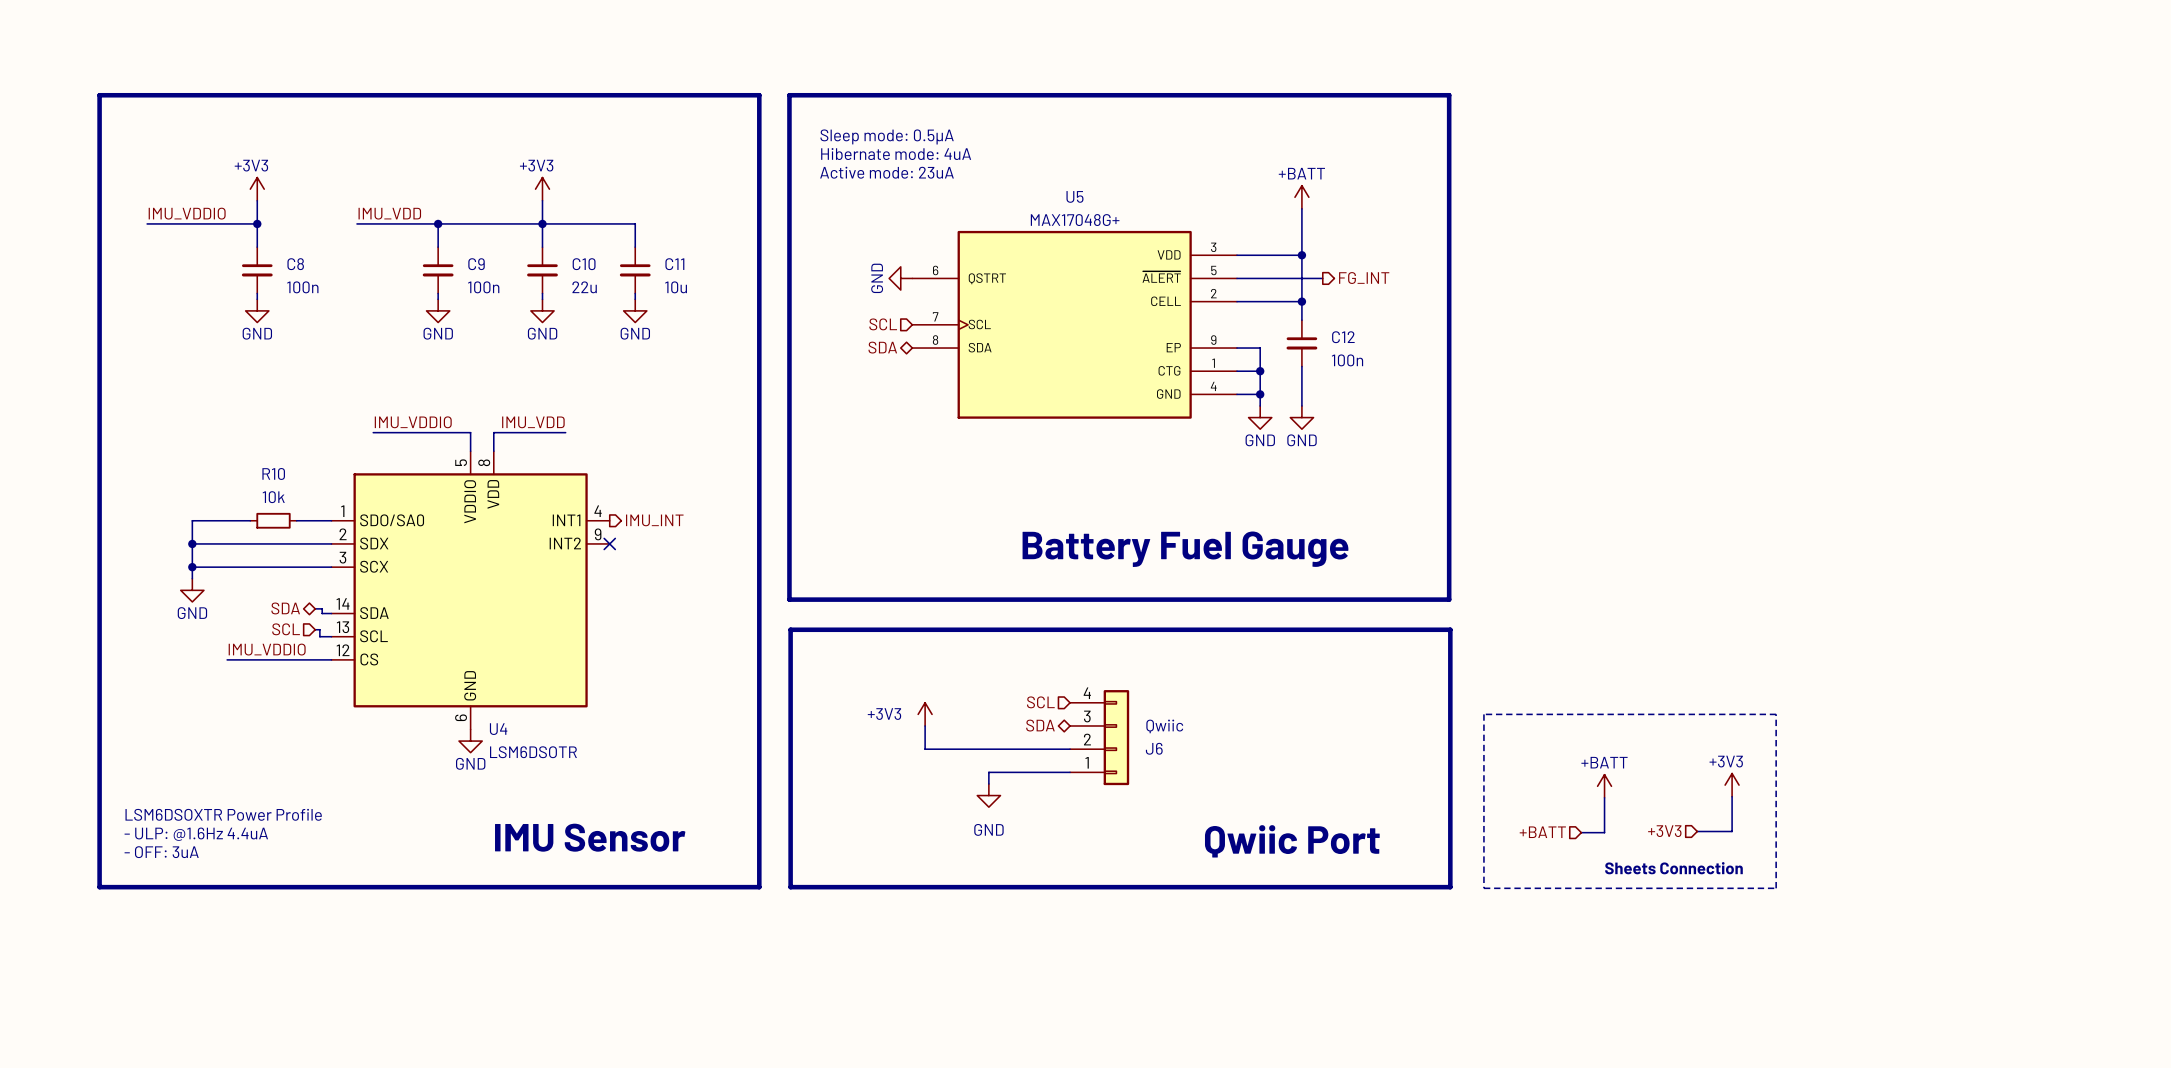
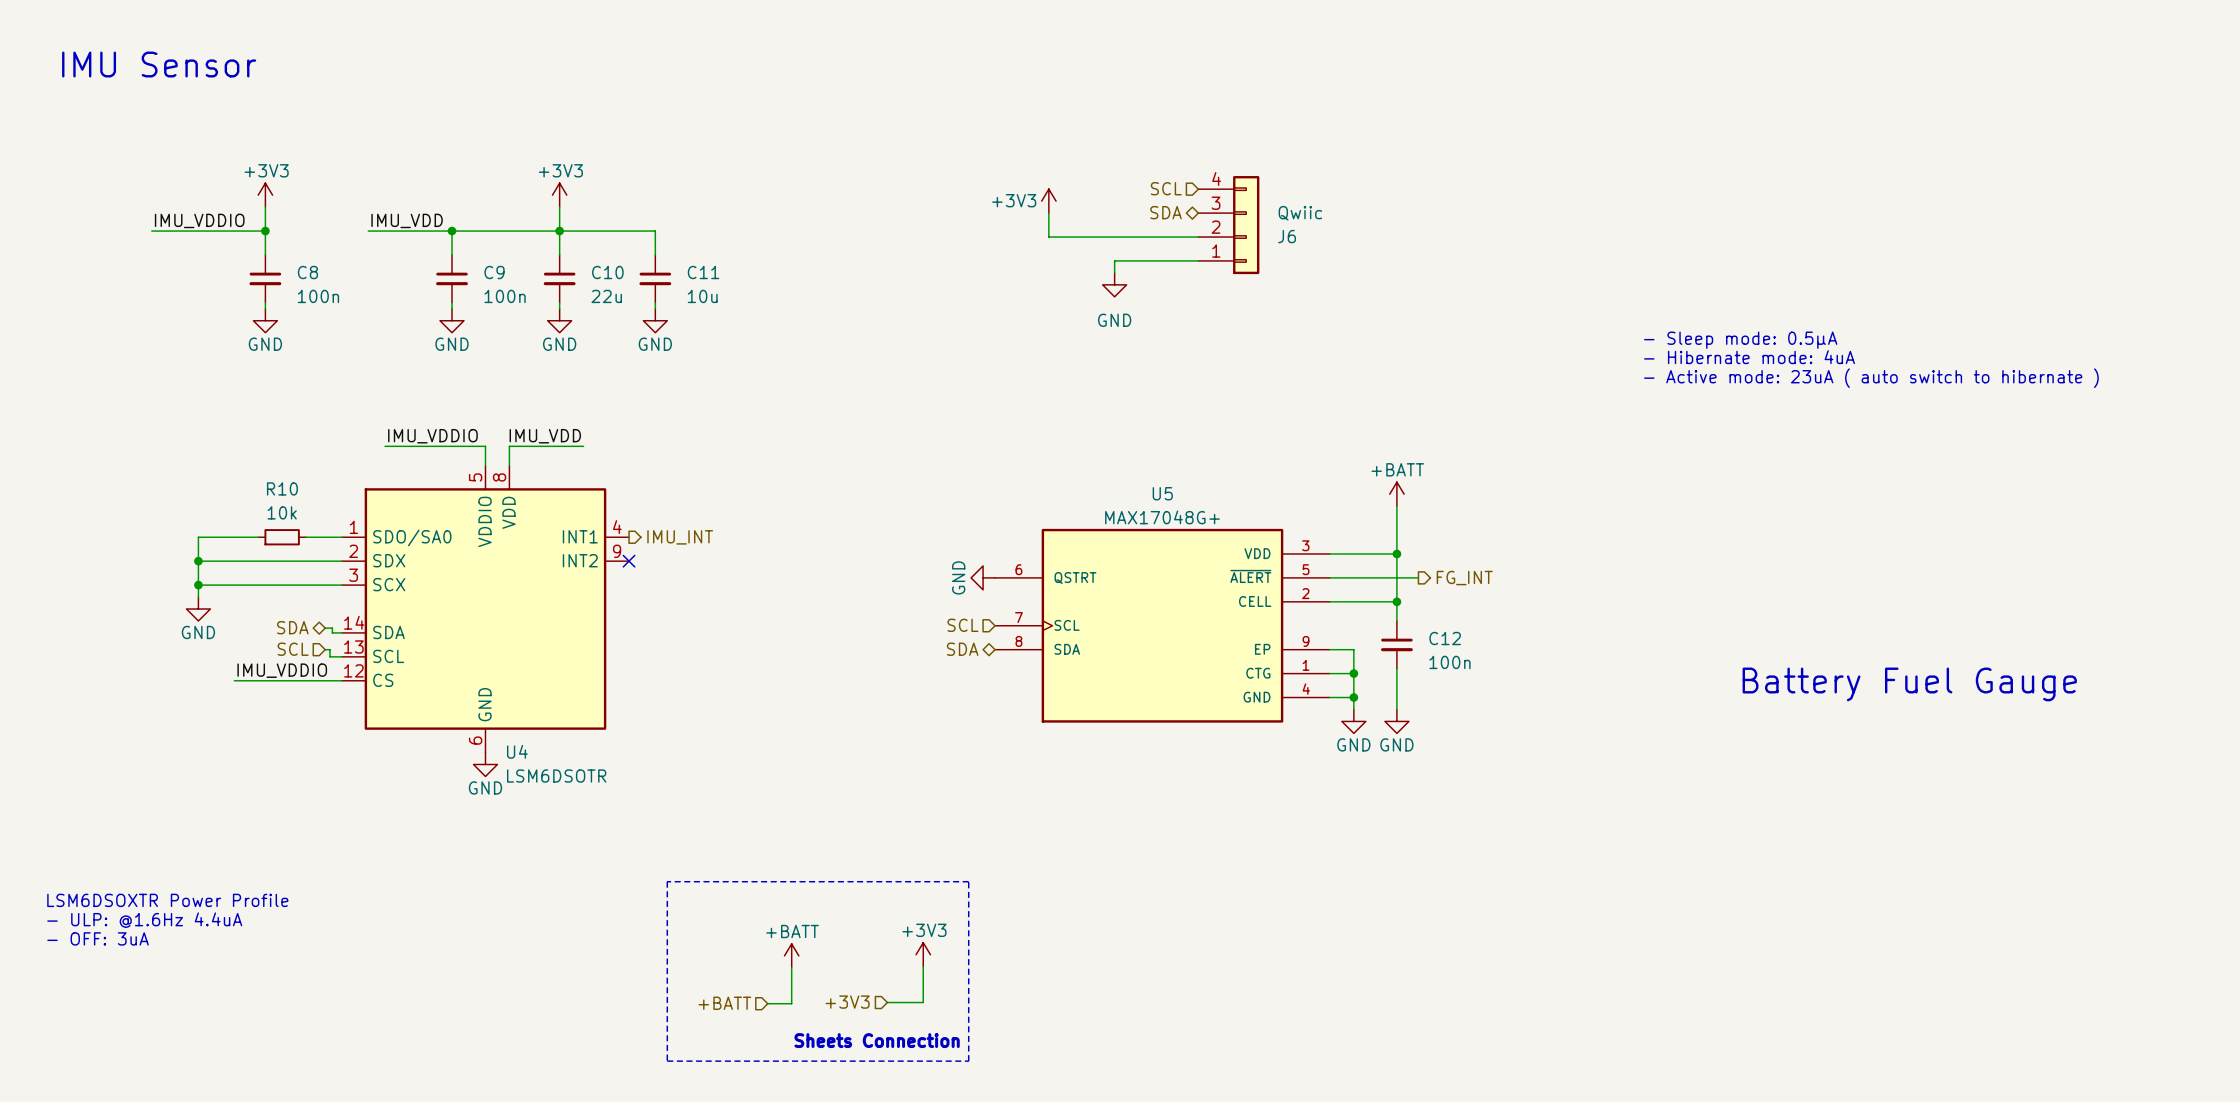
text: none -> IMU Sensor (159, 64)
line: (99, 95) (759, 95) (759, 887) (99, 887) (99, 95) -> none
line: (789, 95) (1449, 95) (1449, 599) (789, 599) (789, 95) -> none
text: Sleep mode: 0.5µA (887, 136) -> none
text: Hibernate mode: 4uA (896, 154) -> none
text: Active mode: 23uA (886, 172) -> none
hierarchical label: none -> SCL (1166, 188)
power symbol: none -> +3V3 (1048, 201)
power symbol: +BATT (1301, 197) -> none
wire: none -> (1048, 213) (1048, 237) (1198, 237)
hierarchical label: none -> SDA (1166, 212)
wire: (1301, 208) (1301, 320) -> none
wire: (1237, 255) (1301, 255) -> none
junction: (1301, 255) -> none
power symbol: none -> GND (1114, 284)
power symbol: GND (900, 278) -> none
wire: (1237, 278) (1322, 278) -> none
hierarchical label: FG_INT (1364, 278) -> none
wire: (1237, 301) (1301, 301) -> none
junction: (1301, 301) -> none
hierarchical label: SCL (883, 324) -> none
U5 position: (1074, 324) -> (1162, 625)
text: none -> - Sleep mode: 0.5µA (1740, 340)
C12 position: (1301, 343) -> (1396, 644)
text: none -> - Hibernate mode: 4uA (1749, 357)
hierarchical label: SDA (882, 347) -> none
wire: (1237, 348) (1260, 348) (1260, 405) -> none
text: none -> - Active mode: 23uA ( auto switch to hibernate ) (1871, 378)
wire: (1301, 366) (1301, 405) -> none
wire: (1237, 371) (1260, 371) -> none
junction: (1260, 371) -> none
wire: (1237, 394) (1260, 394) -> none
junction: (1260, 394) -> none
power symbol: GND (1260, 417) -> none
power symbol: GND (1301, 417) -> none
power symbol: none -> +BATT (1396, 494)
wire: none -> (1396, 506) (1396, 620)
wire: none -> (1329, 553) (1396, 553)
junction: none -> (1396, 553)
text: Battery Fuel Gauge (1185, 549) -> none
hierarchical label: none -> FG_INT (1464, 578)
power symbol: none -> GND (983, 577)
wire: none -> (1329, 577) (1418, 577)
wire: none -> (1329, 601) (1396, 601)
junction: none -> (1396, 601)
line: (790, 629) (1450, 629) (1450, 887) (790, 887) (790, 629) -> none
wire: none -> (1329, 649) (1353, 649) (1353, 709)
wire: none -> (1396, 668) (1396, 709)
wire: none -> (1329, 673) (1353, 673)
junction: none -> (1353, 673)
text: none -> Battery Fuel Gauge (1909, 684)
wire: none -> (1329, 697) (1353, 697)
junction: none -> (1353, 697)
power symbol: none -> GND (1353, 721)
power symbol: none -> GND (1396, 721)
hierarchical label position: SCL (1040, 702) -> SCL (962, 625)
power symbol text position: +3V3 (884, 714) -> +3V3 (924, 930)
power symbol position: +3V3 (925, 714) -> +3V3 (923, 954)
line: (1483, 714) (1776, 714) (1776, 888) (1483, 888) (1483, 714) -> none
wire: (925, 725) (925, 749) (1070, 749) -> none
hierarchical label position: SDA (1040, 725) -> SDA (962, 649)
J6 position: (1099, 737) -> (1228, 225)
wire: (1070, 772) (988, 772) (988, 783) -> none
power symbol: +3V3 (1732, 785) -> none
power symbol: +BATT (1604, 786) -> none
power symbol: GND (988, 795) -> none
wire: (1732, 796) (1732, 831) (1697, 831) -> none
wire: (1604, 797) (1604, 832) (1581, 832) -> none
text position: LSM6DSOXTR Power Profile (223, 814) -> LSM6DSOXTR Power Profile (167, 900)
hierarchical label: +3V3 (1664, 831) -> none
hierarchical label: +BATT (1542, 832) -> none
text position: - ULP: @1.6Hz 4.4uA (196, 834) -> - ULP: @1.6Hz 4.4uA (144, 920)
text: IMU Sensor (590, 837) -> none
text: Qwiic Port (1292, 841) -> none
text position: - OFF: 3uA (161, 852) -> - OFF: 3uA (98, 938)
line: none -> (667, 881) (968, 881) (968, 1061) (667, 1061) (667, 881)
text: Sheets Connection (1673, 868) -> none
power symbol: none -> +BATT (791, 955)
wire: none -> (923, 966) (923, 1002) (887, 1002)
wire: none -> (791, 967) (791, 1003) (767, 1003)
hierarchical label: none -> +3V3 (847, 1002)
hierarchical label: none -> +BATT (724, 1003)
text: none -> Sheets Connection (877, 1040)

